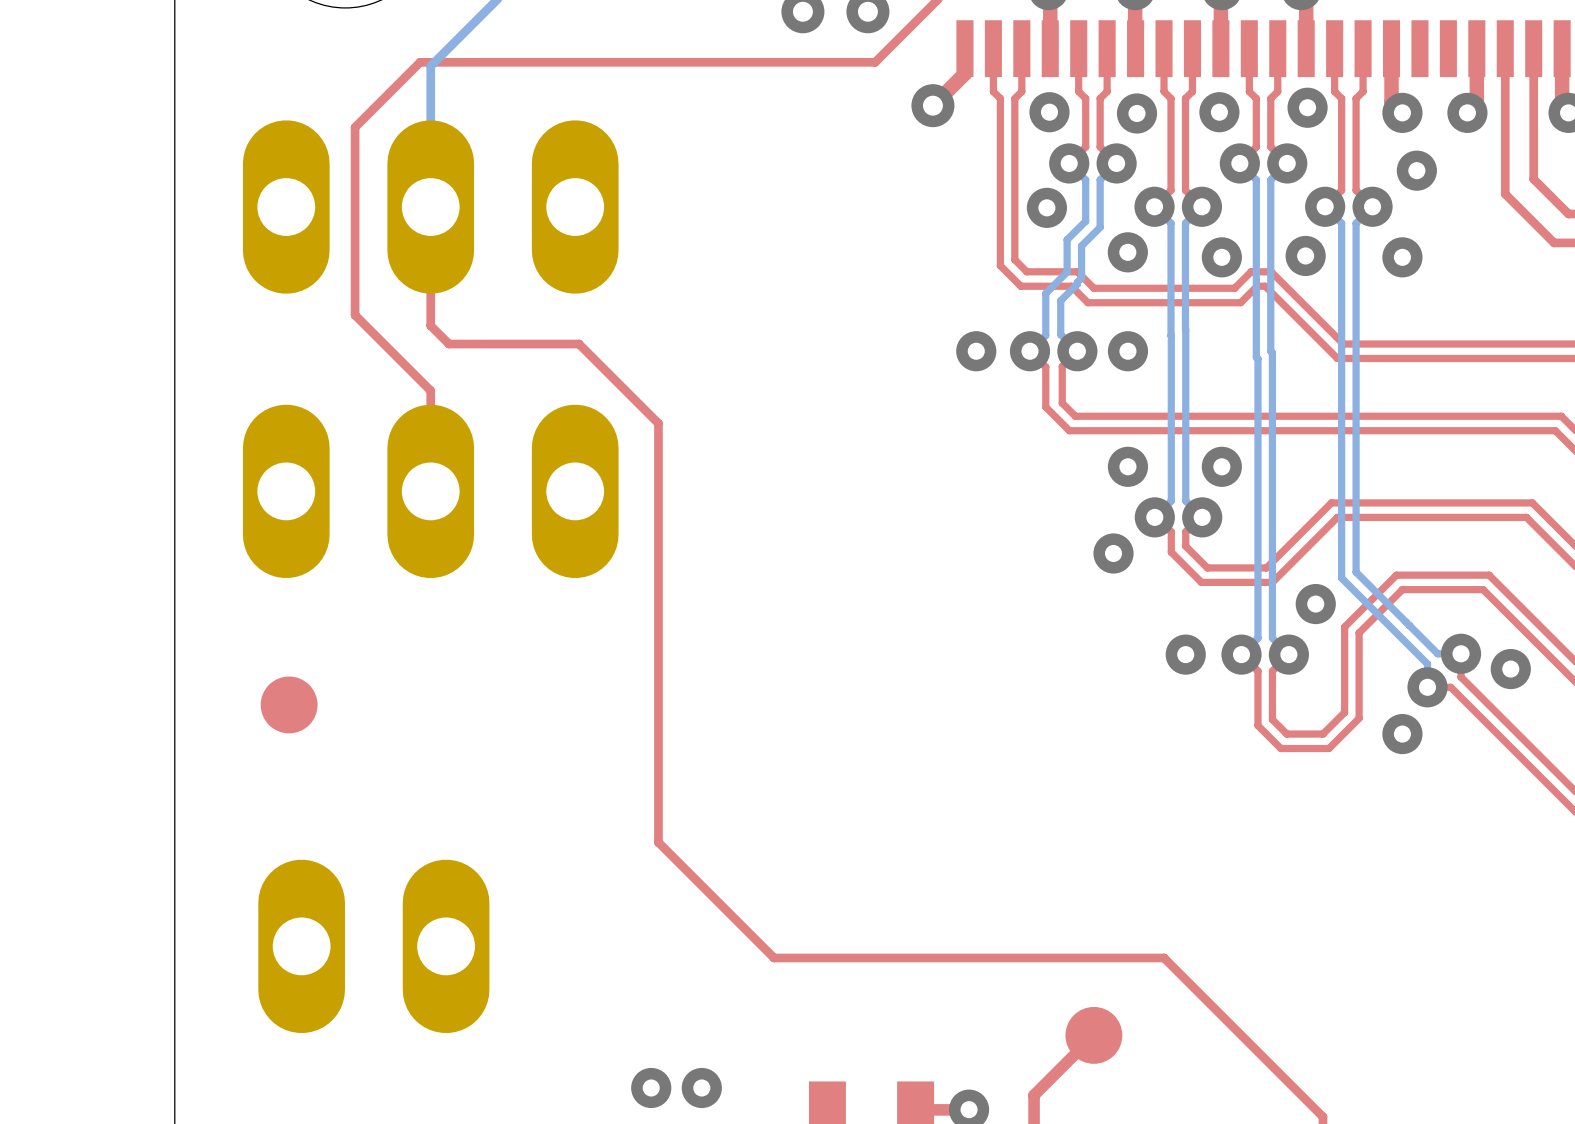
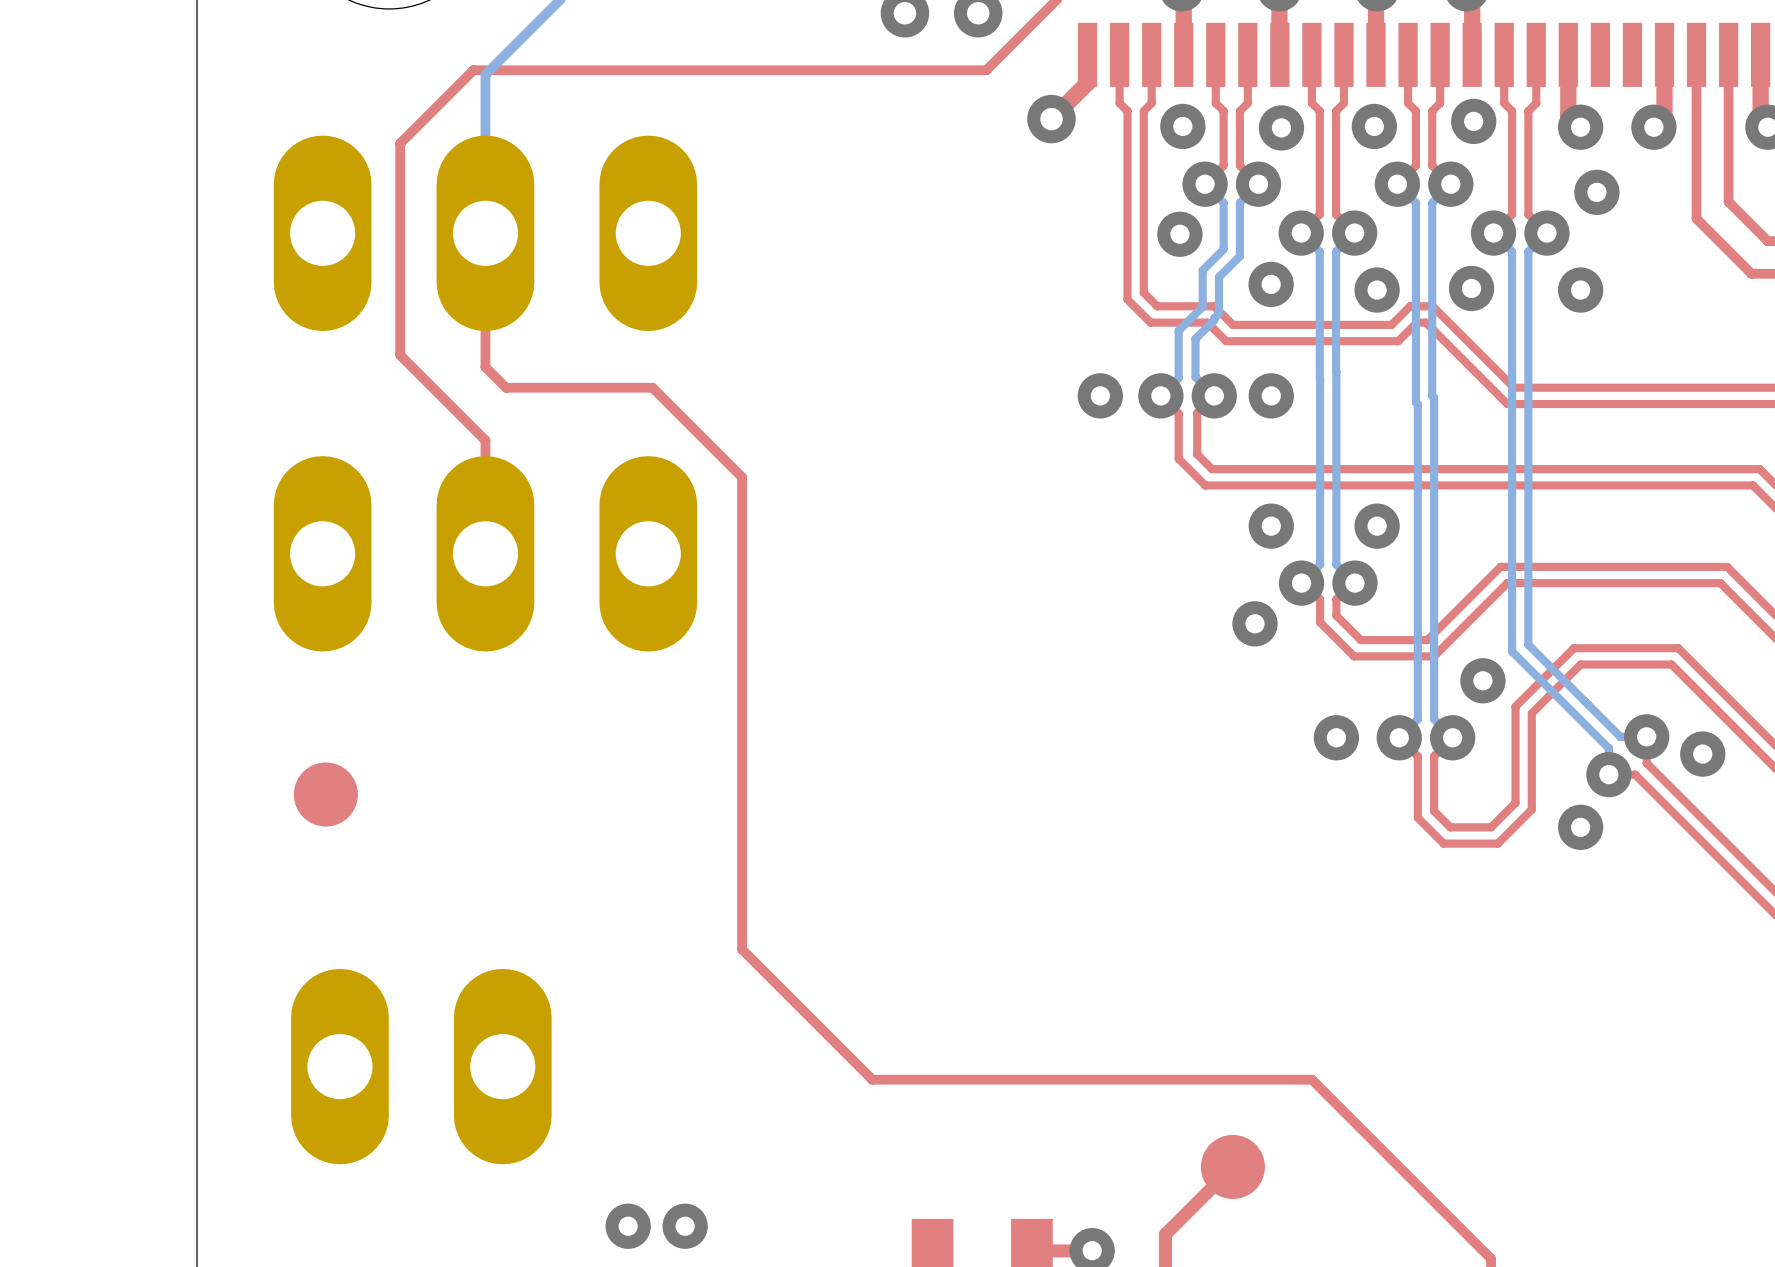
via: none -> (628, 1226)
via position: (651, 1087) -> (685, 1226)
via: (701, 1087) -> none

